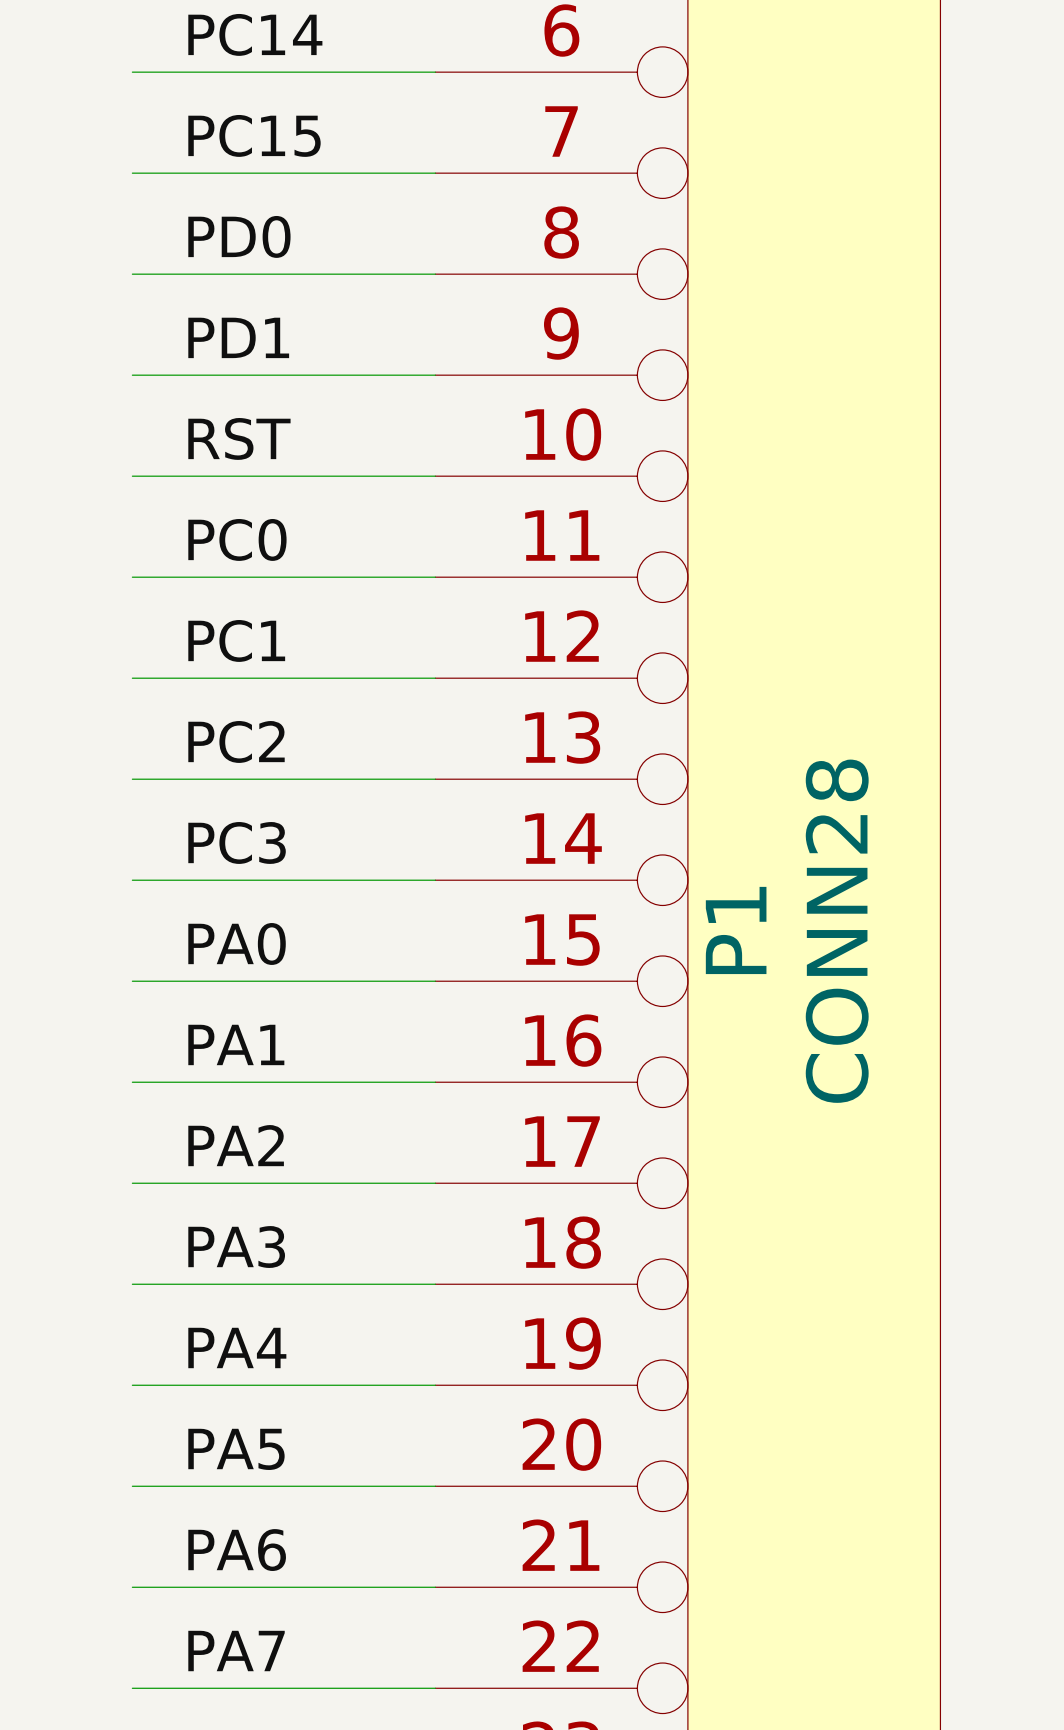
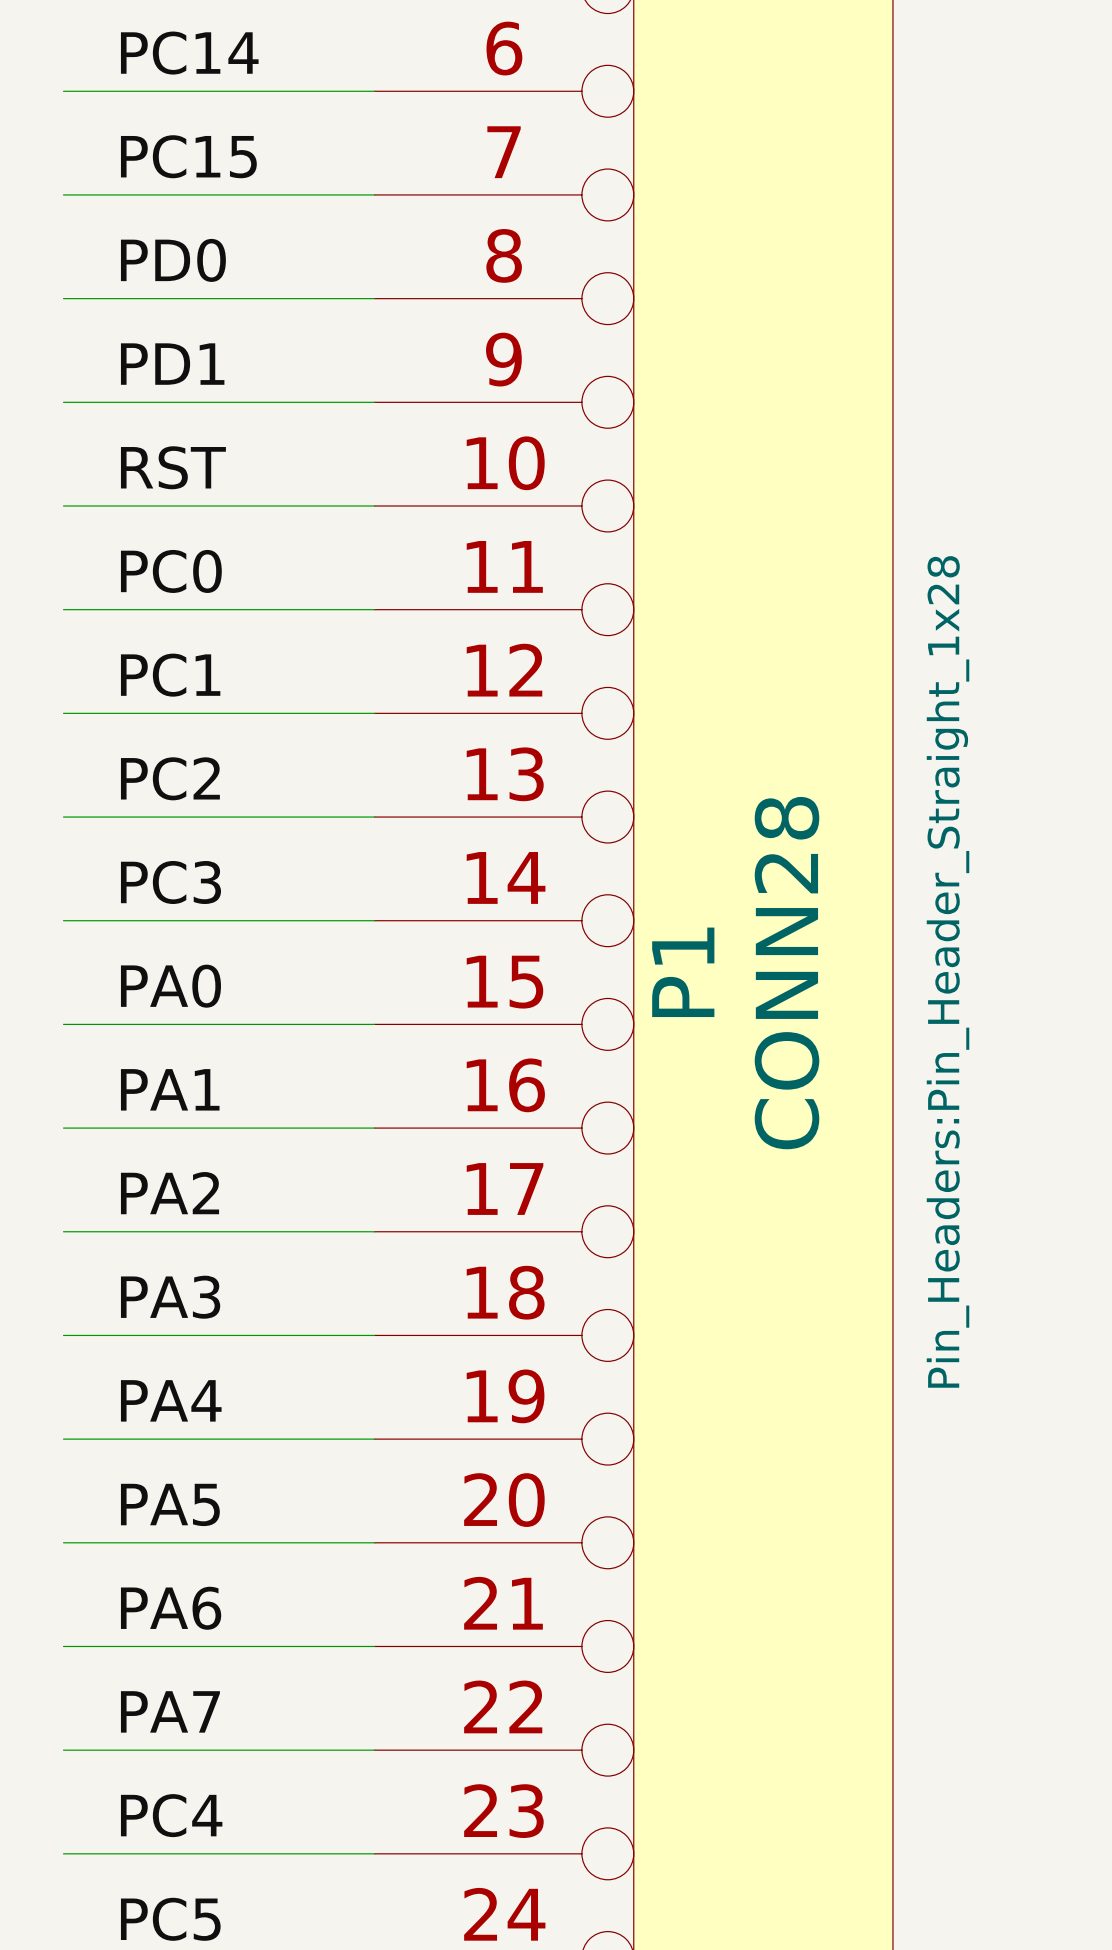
P1 text: none -> Pin_Headers:Pin_Header_Straight_1x28 (948, 971)

